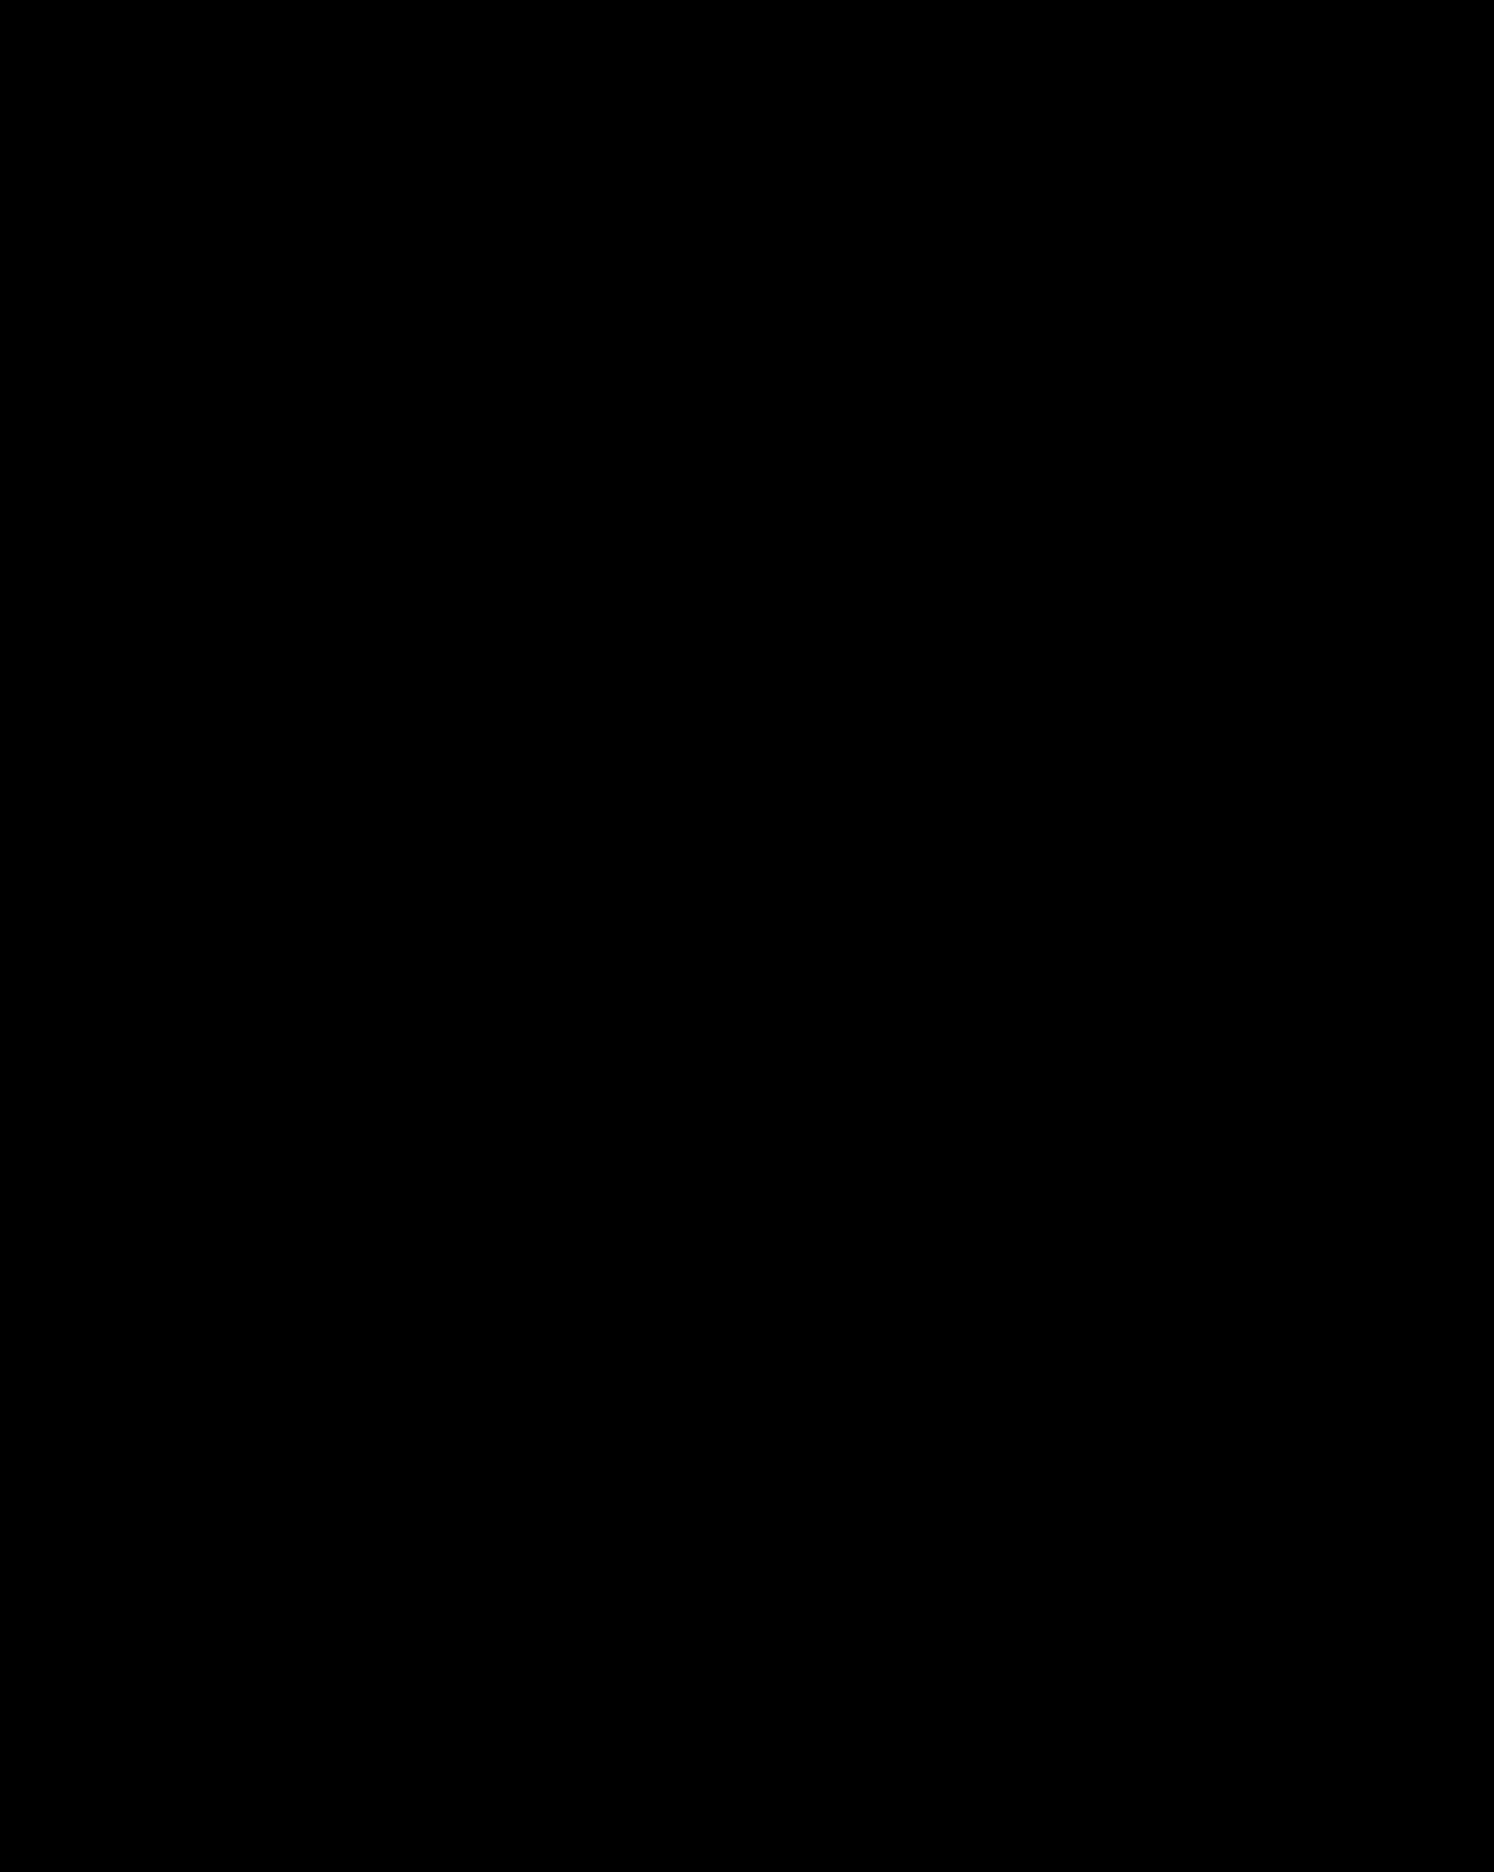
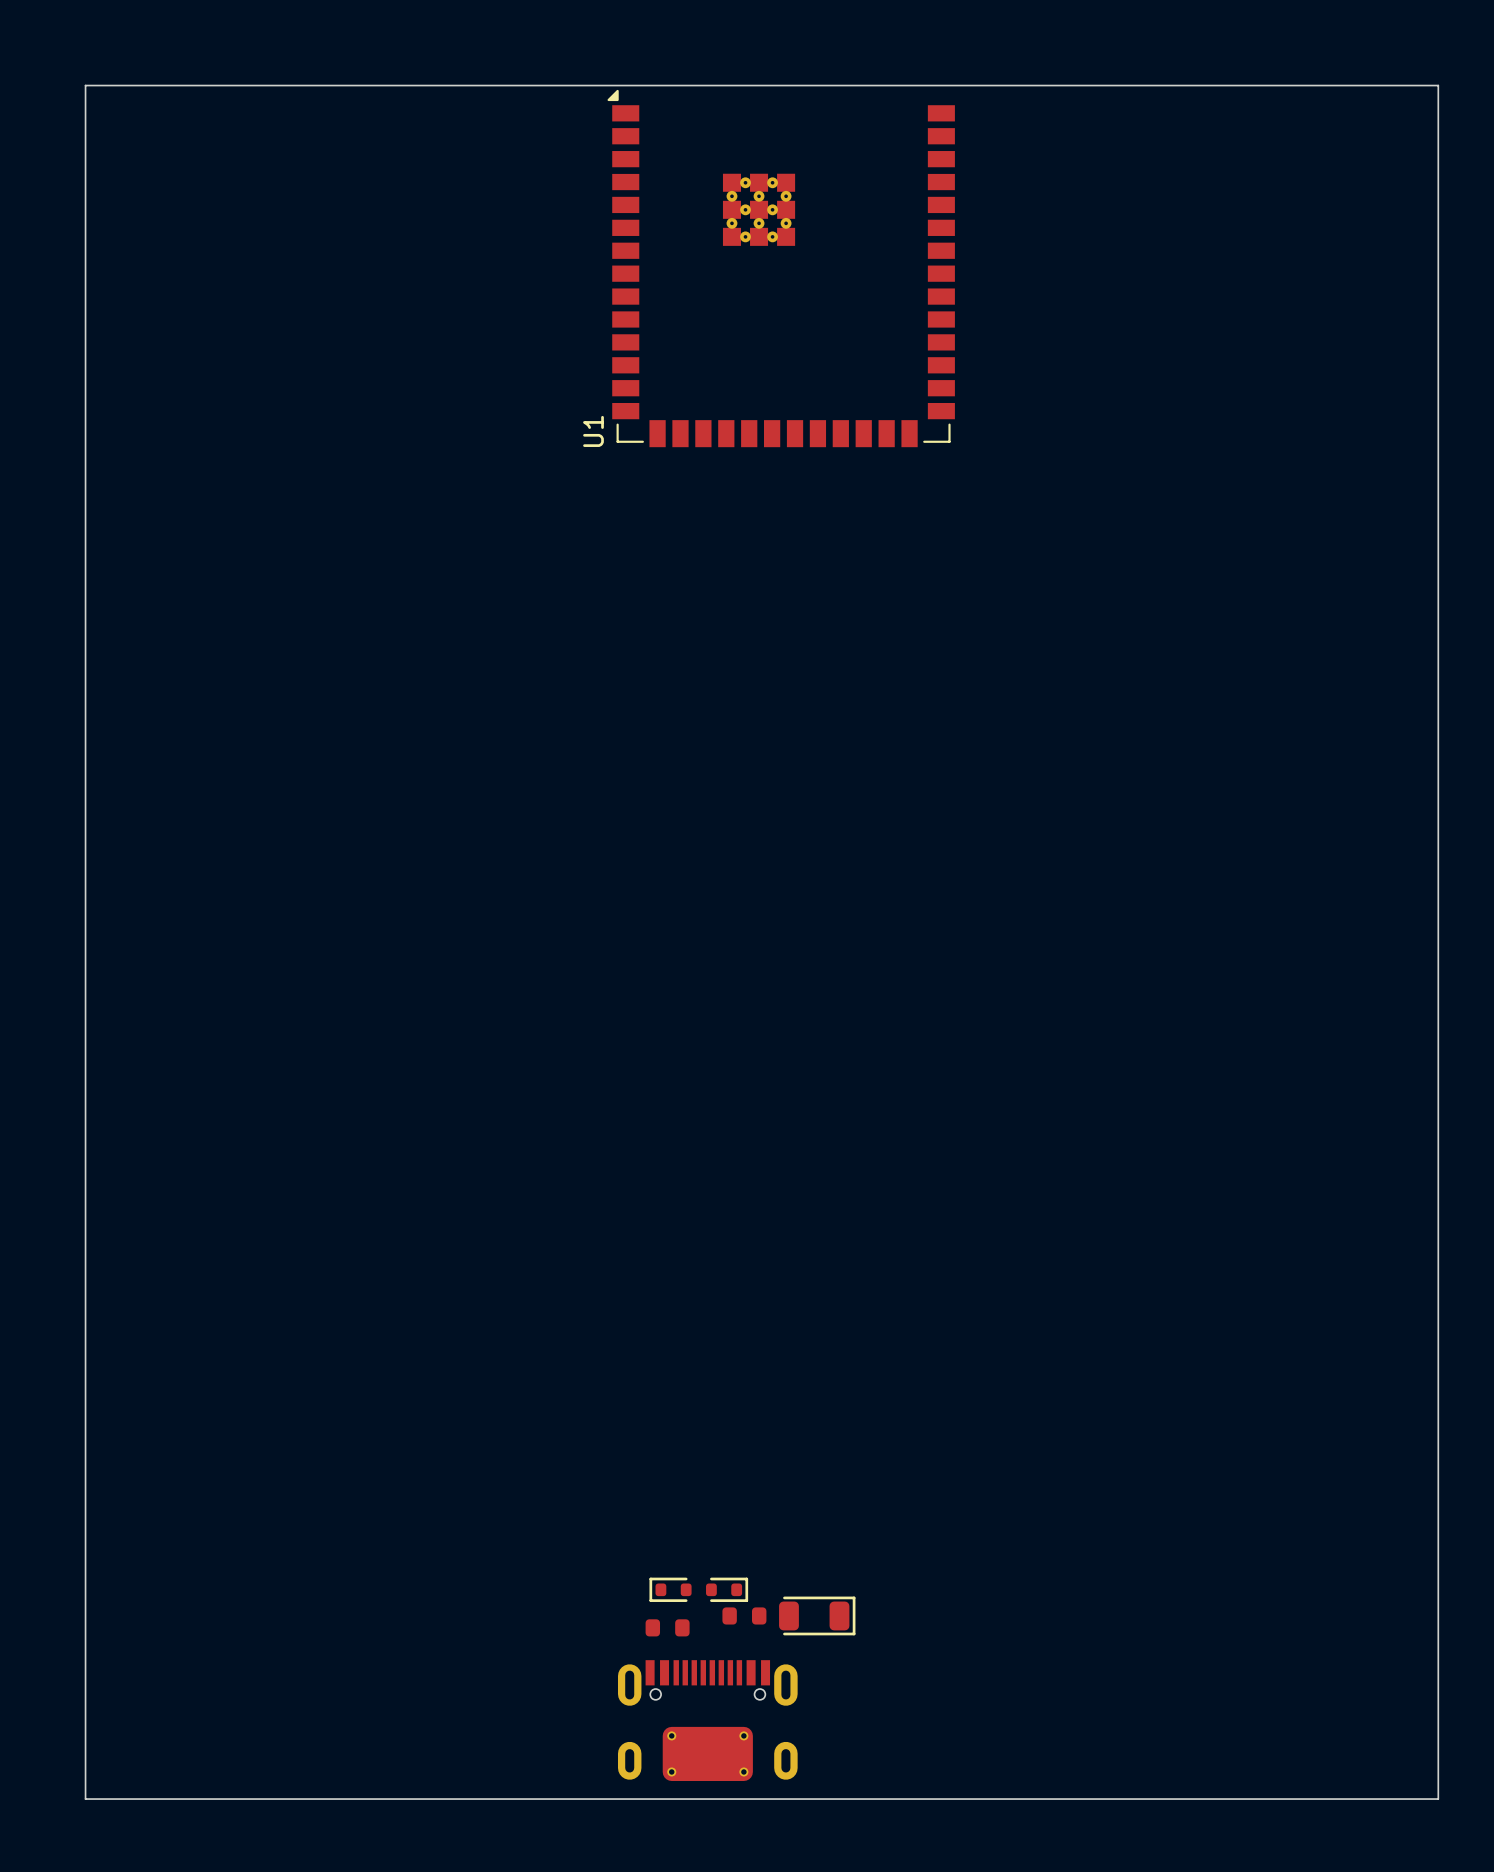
board edge: none -> (85, 85) (85, 1799) (1438, 1799) (1438, 85) (85, 85)
U1: none -> (781, 268)
part: none -> (670, 1589)
part: none -> (727, 1589)
part: none -> (744, 1615)
part: none -> (817, 1615)
part: none -> (667, 1627)
part: none -> (707, 1720)

